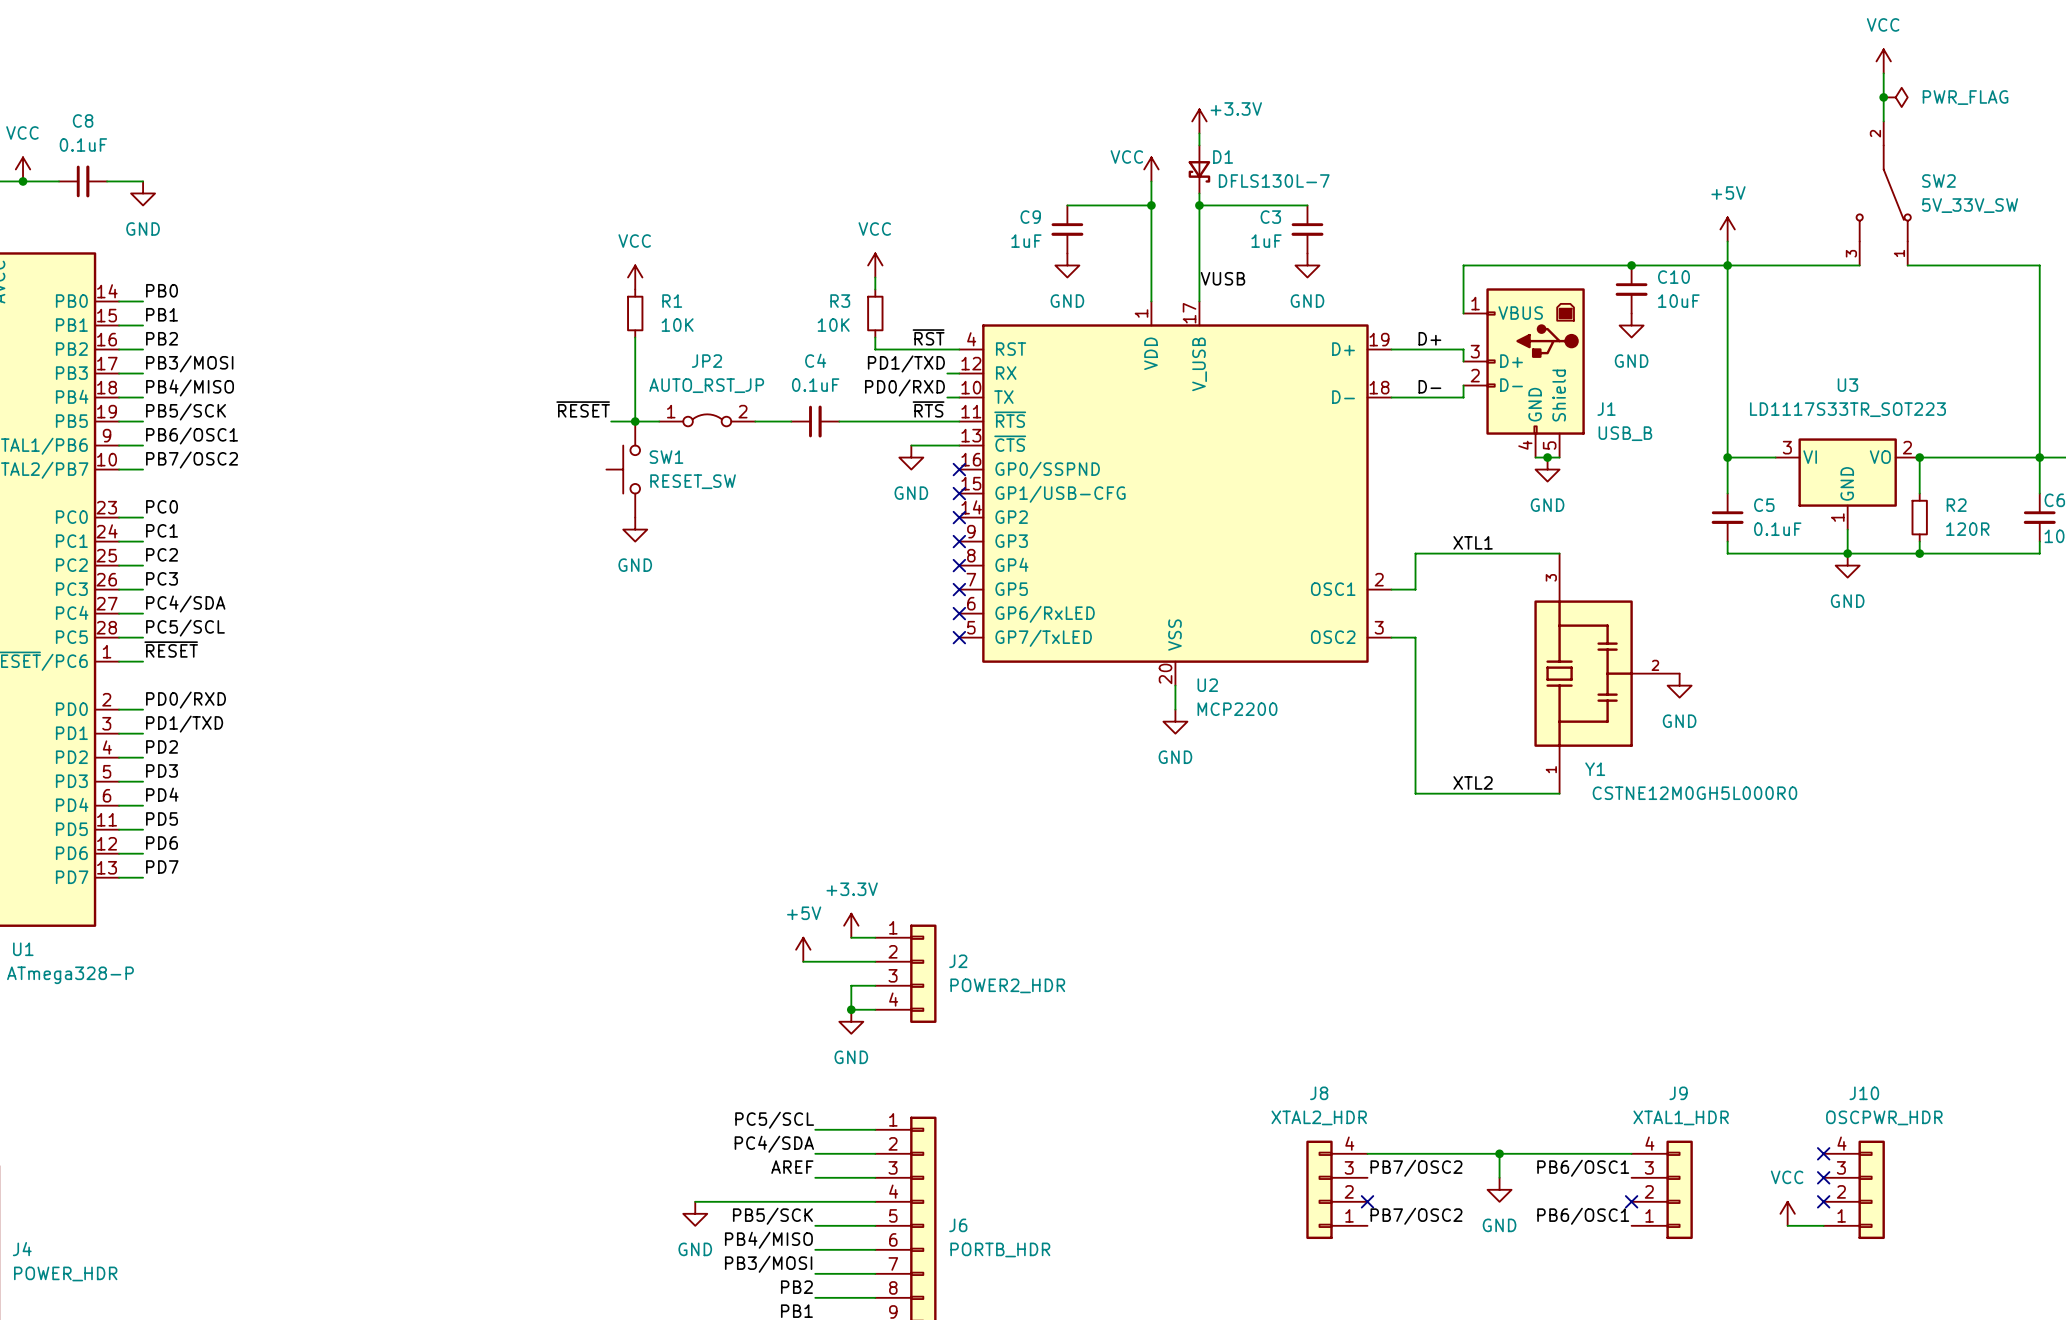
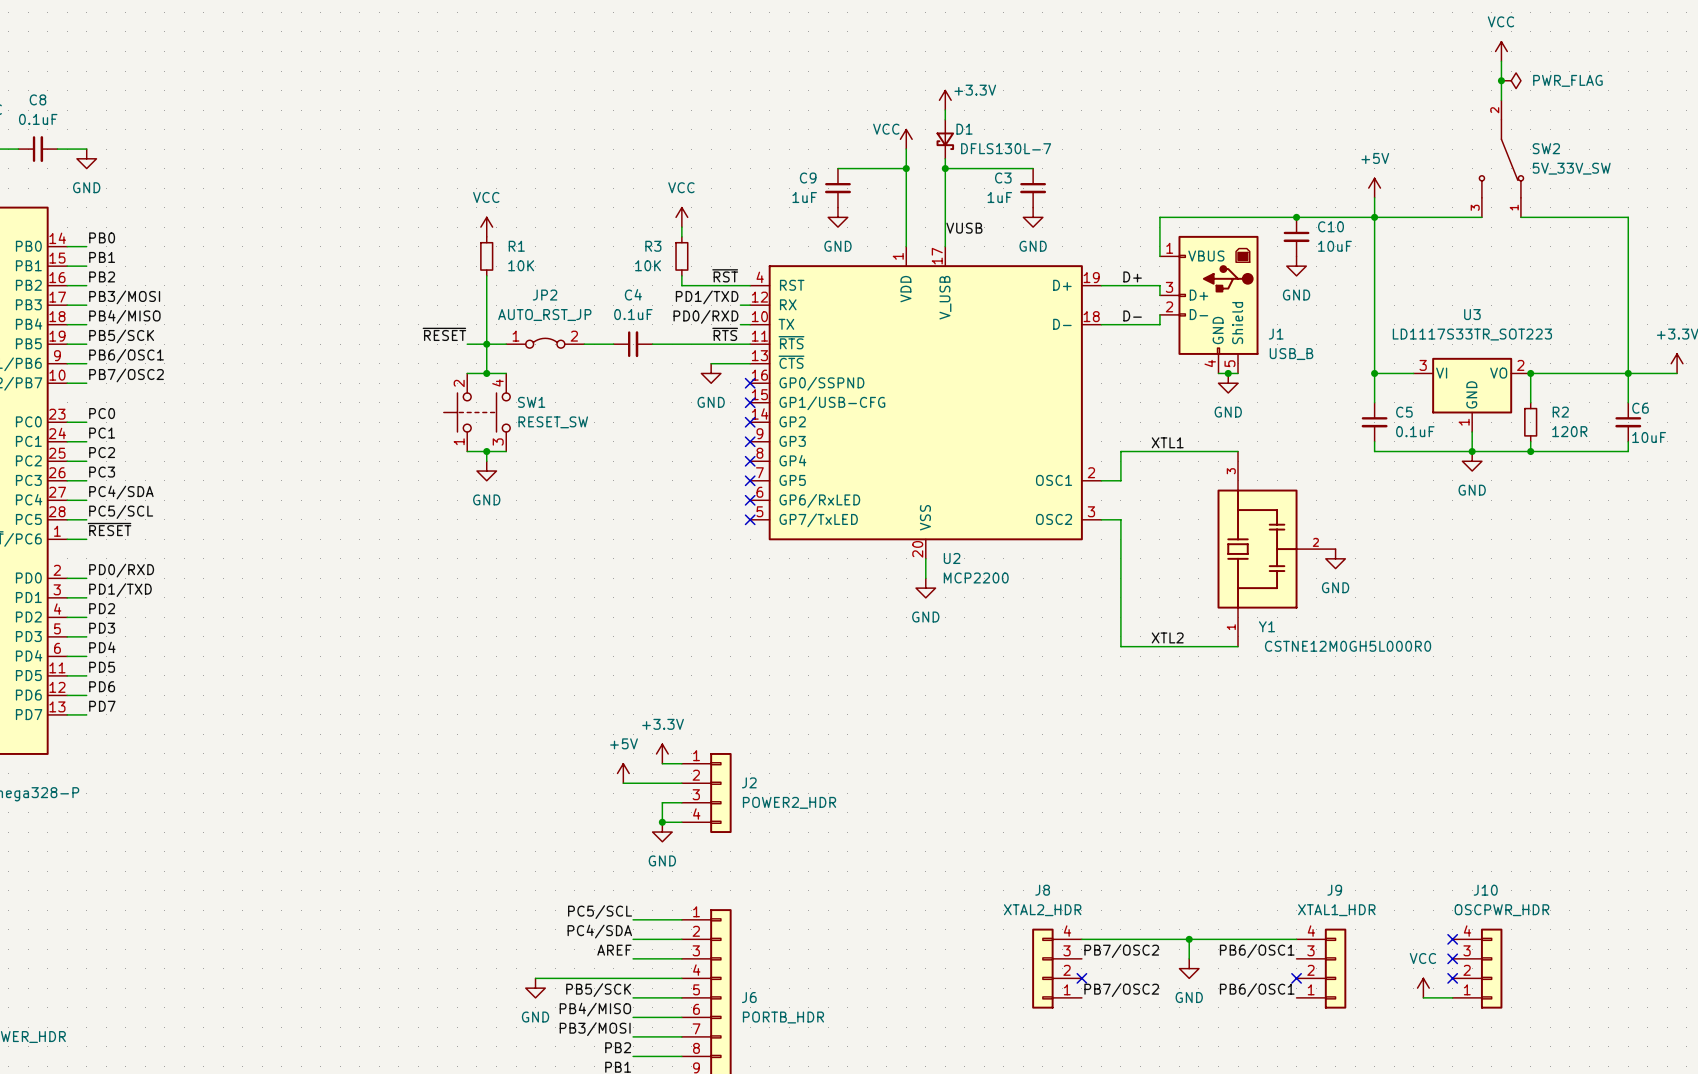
SW1 symbol: [606, 421, 641, 518] -> [443, 373, 511, 452]
wire: none -> (467, 373) (506, 373)
junction: none -> (486, 373)
SW1 name position: SW1 (666, 457) -> SW1 (531, 402)
SW1 value position: RESET_SW (693, 481) -> RESET_SW (553, 422)
power symbol position: GND (635, 529) -> GND (486, 471)
wire: none -> (467, 451) (506, 451)
wire: none -> (486, 451) (486, 461)
junction: none -> (486, 451)

